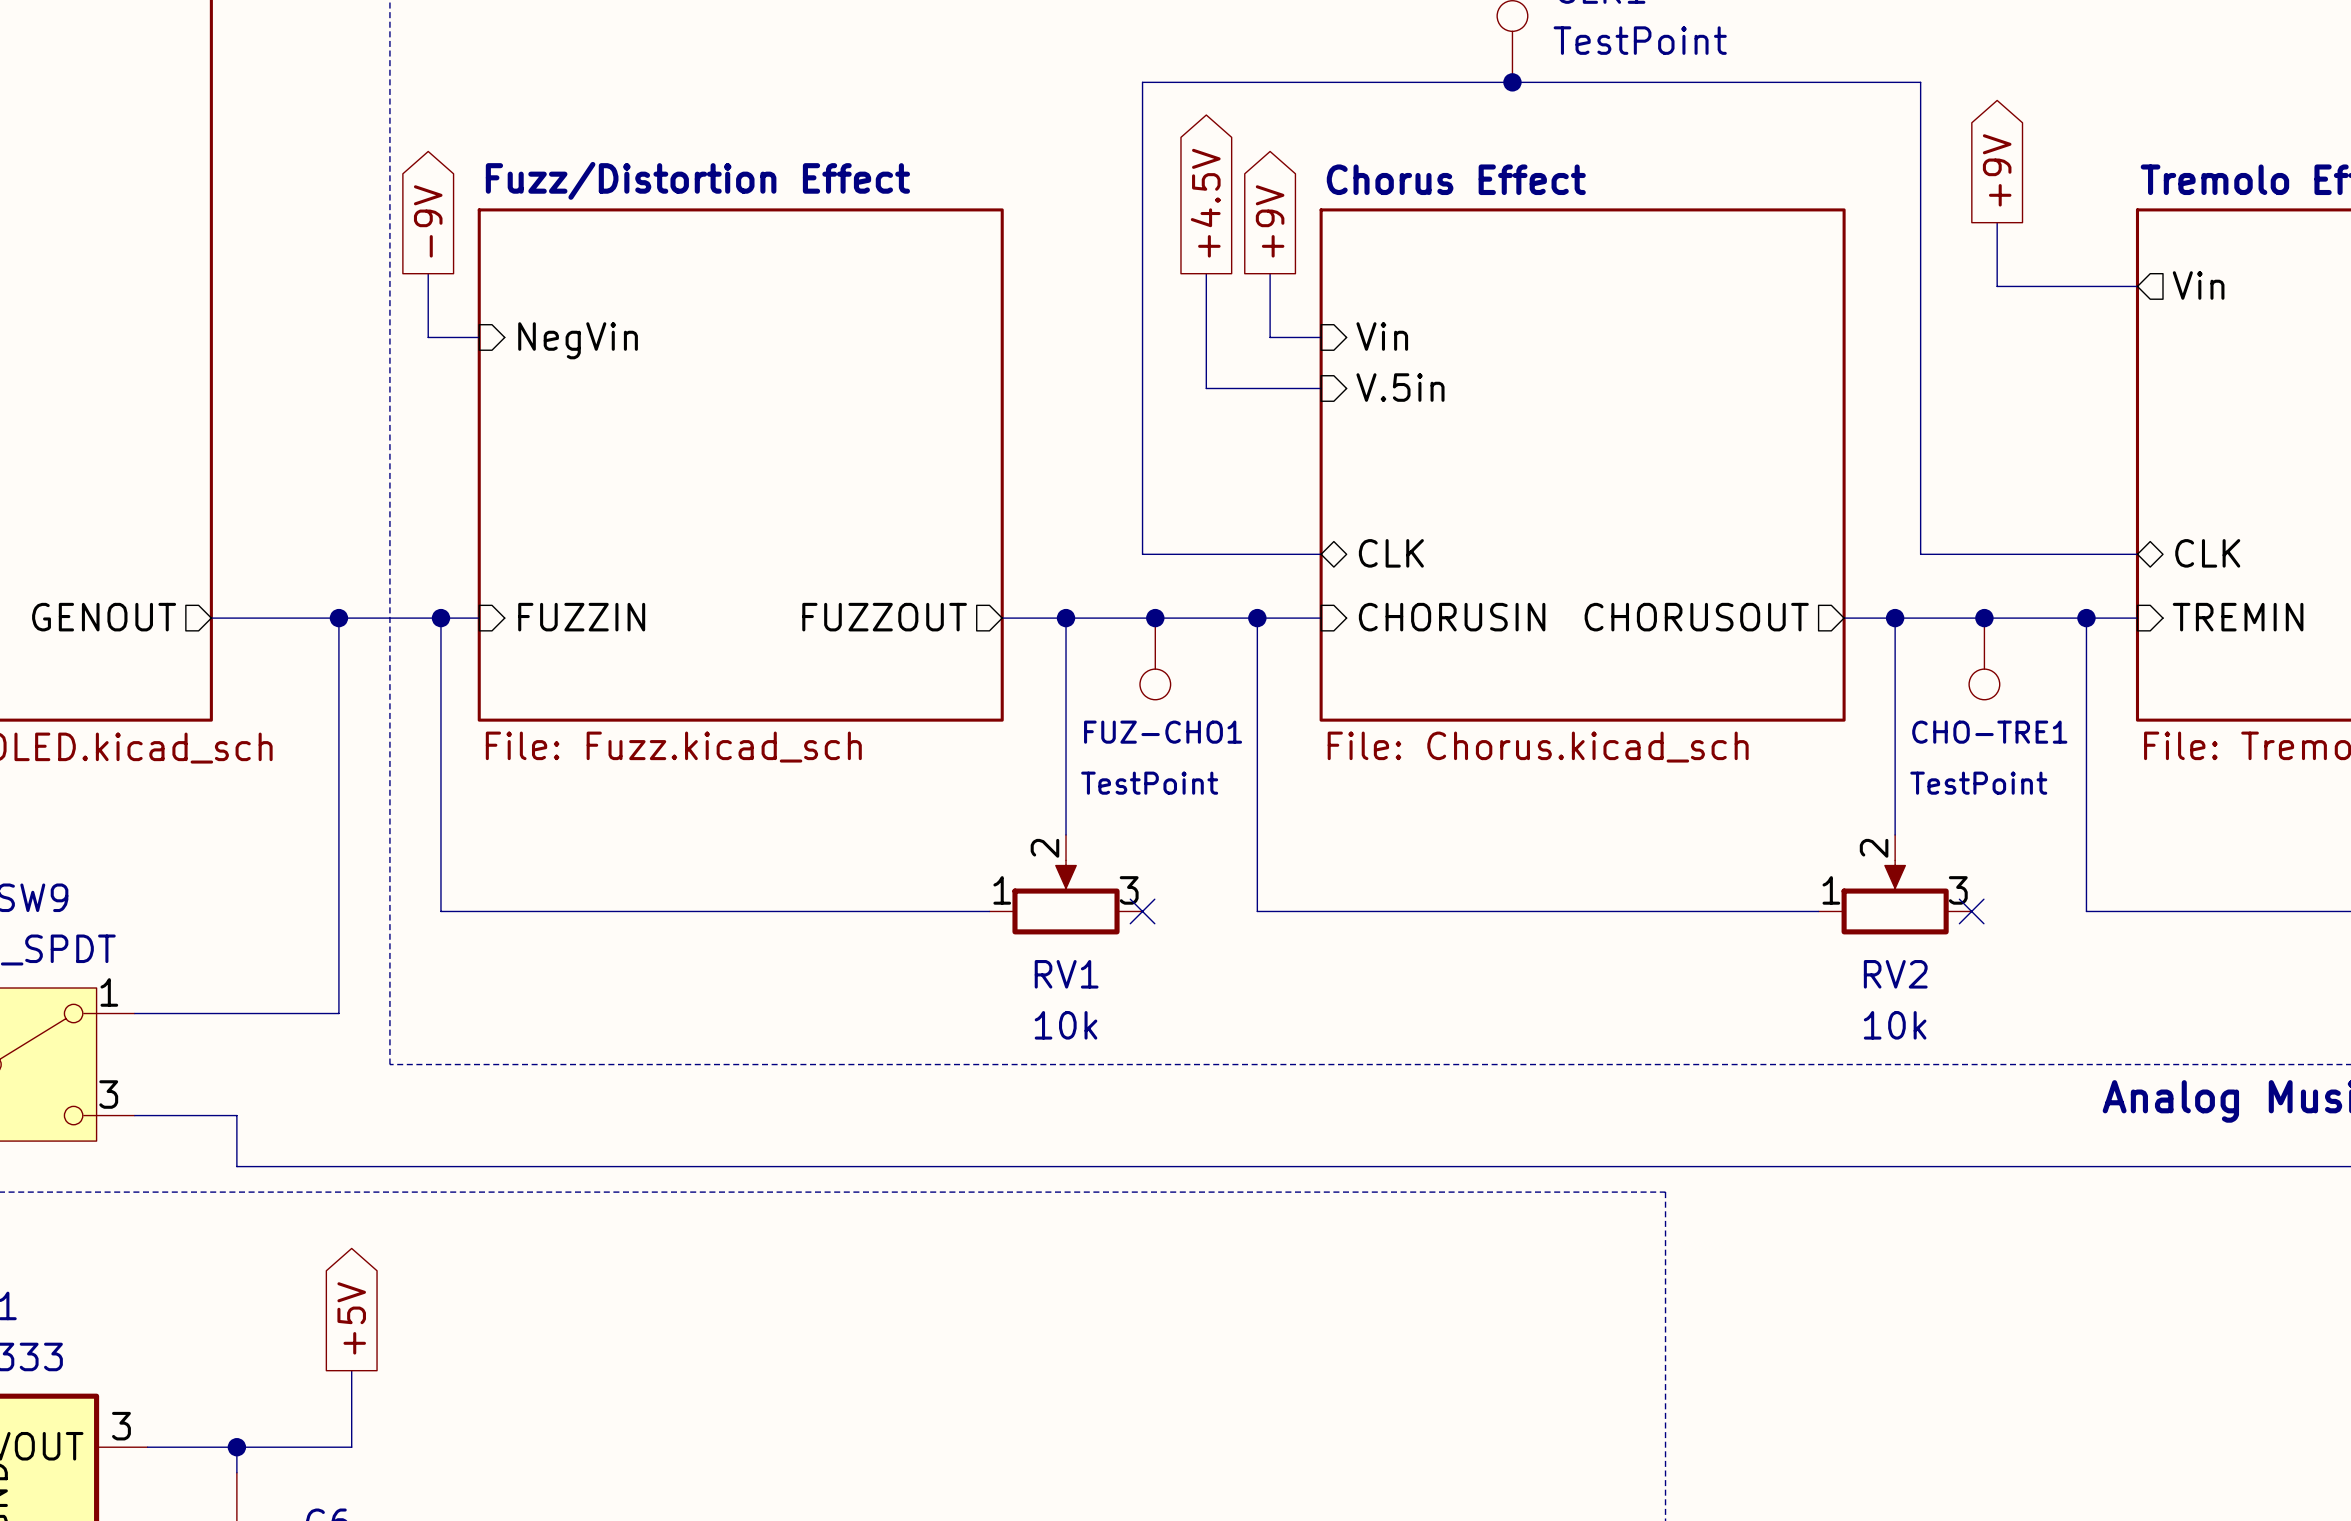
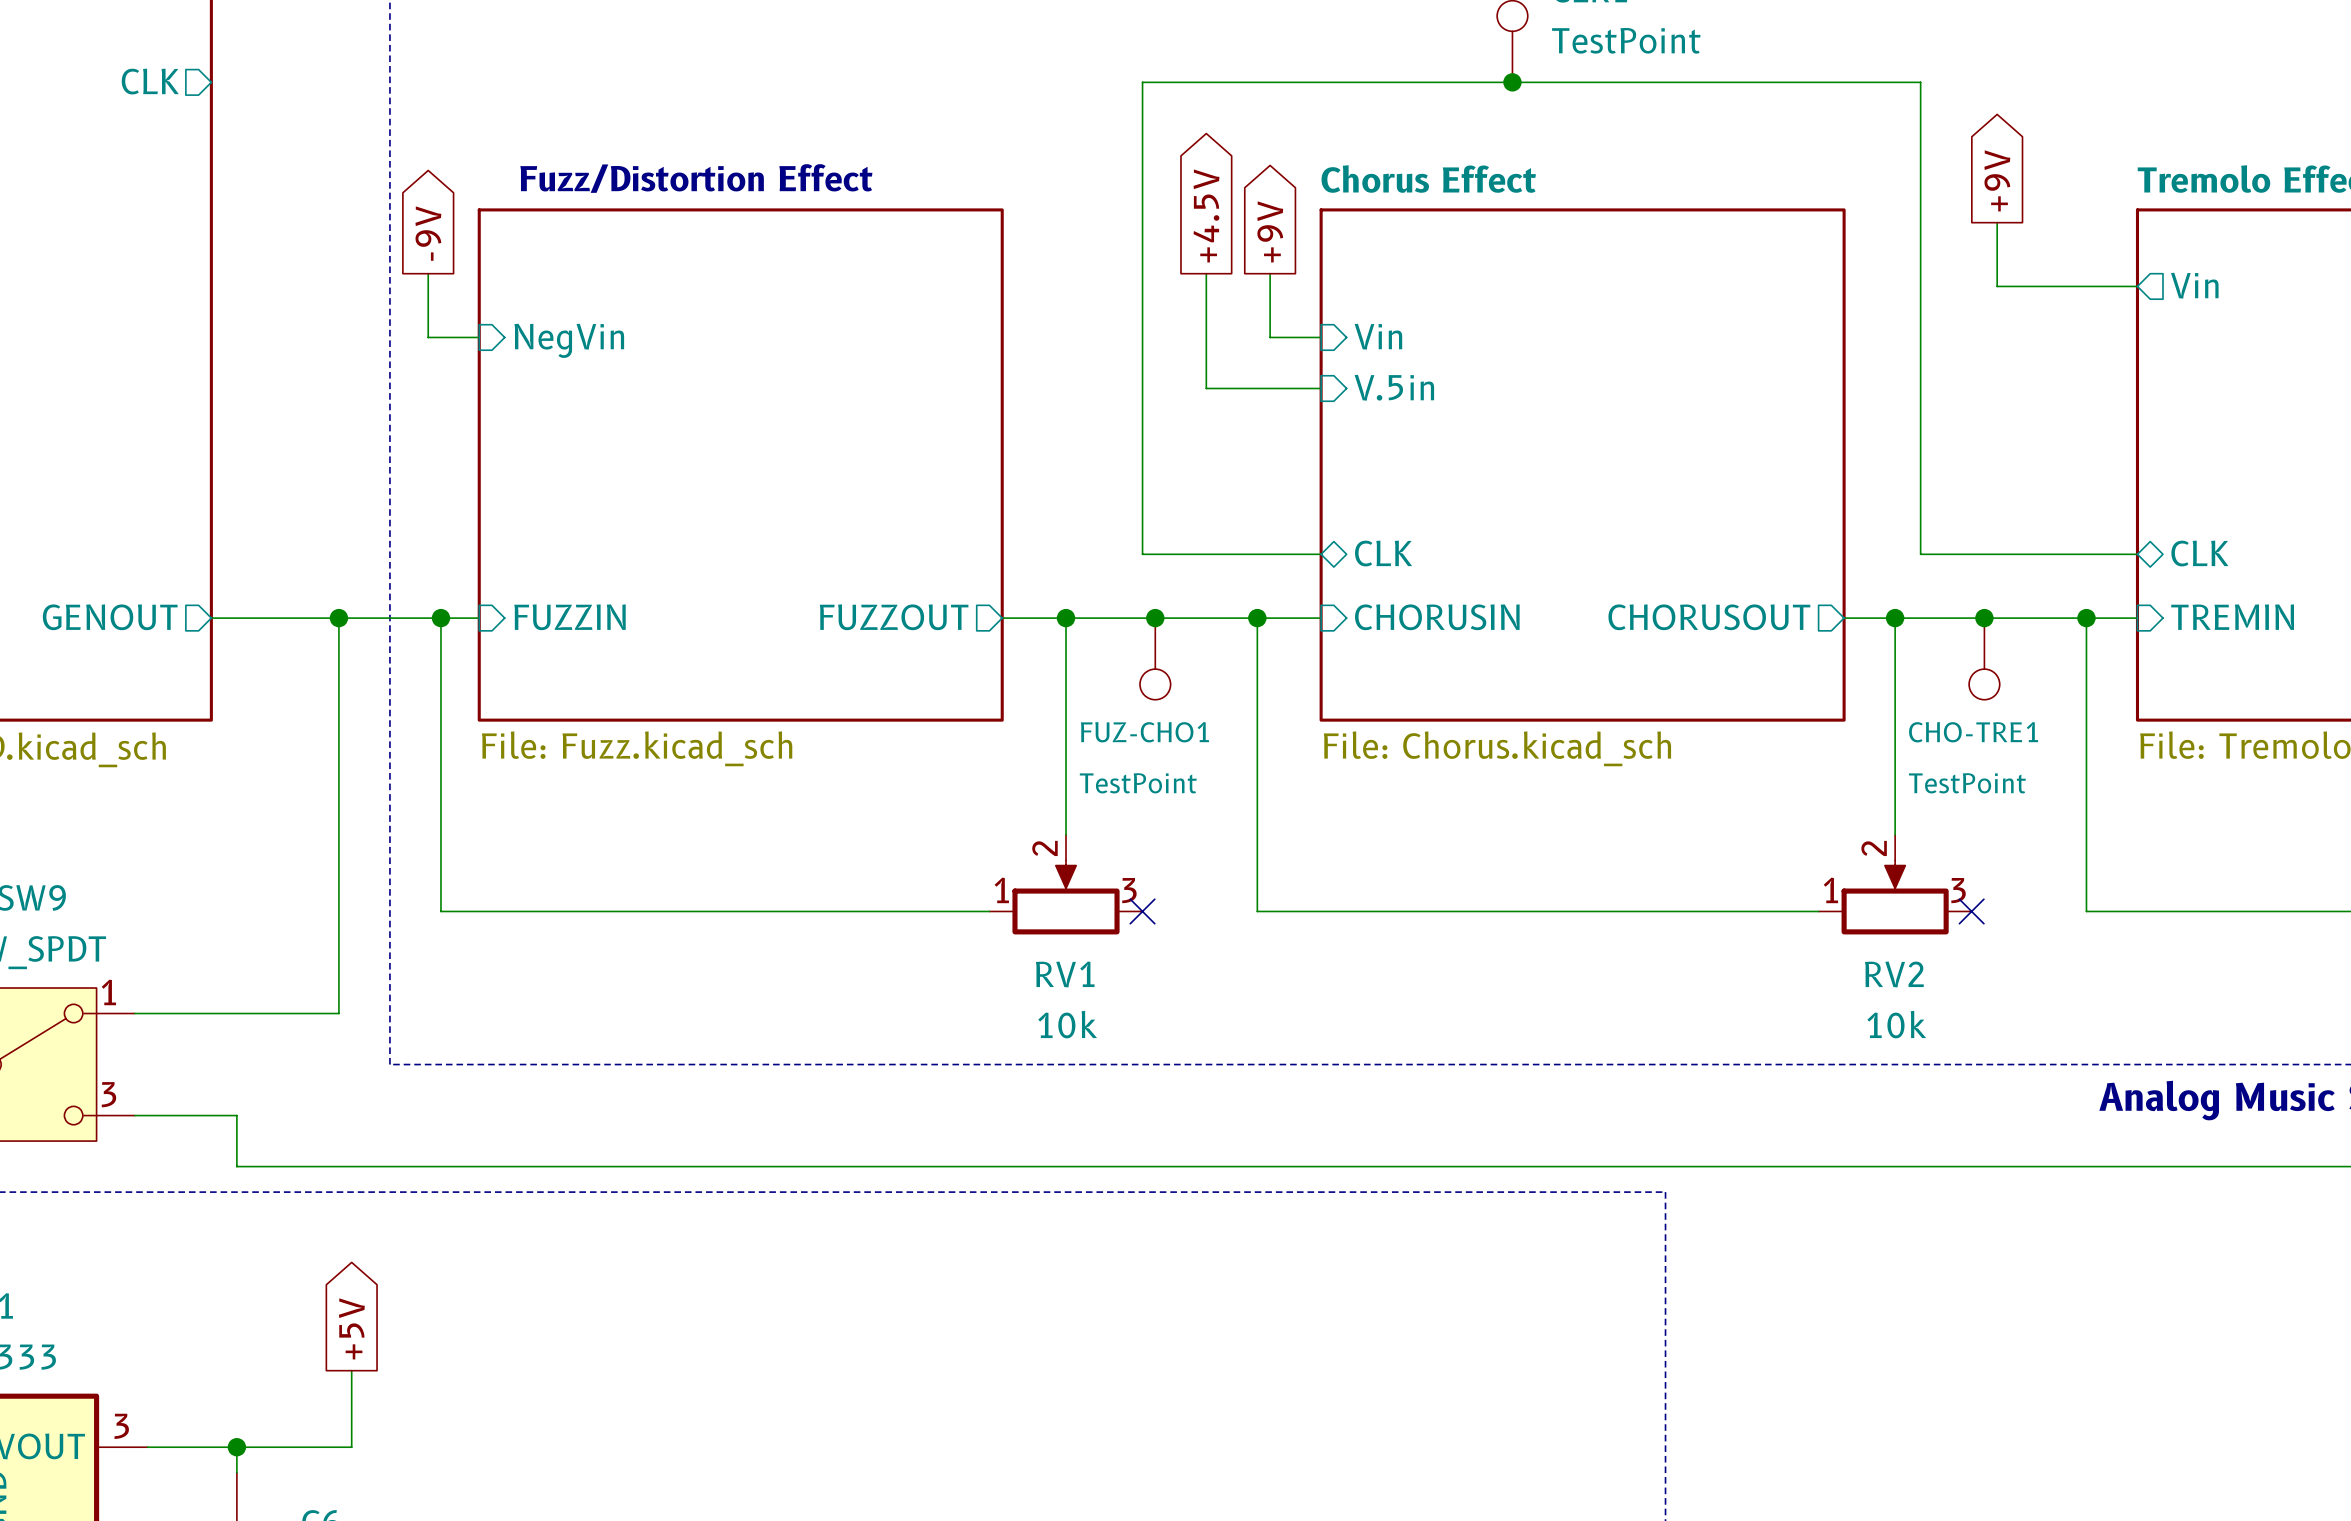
sheet pin: none -> CLK (150, 81)

